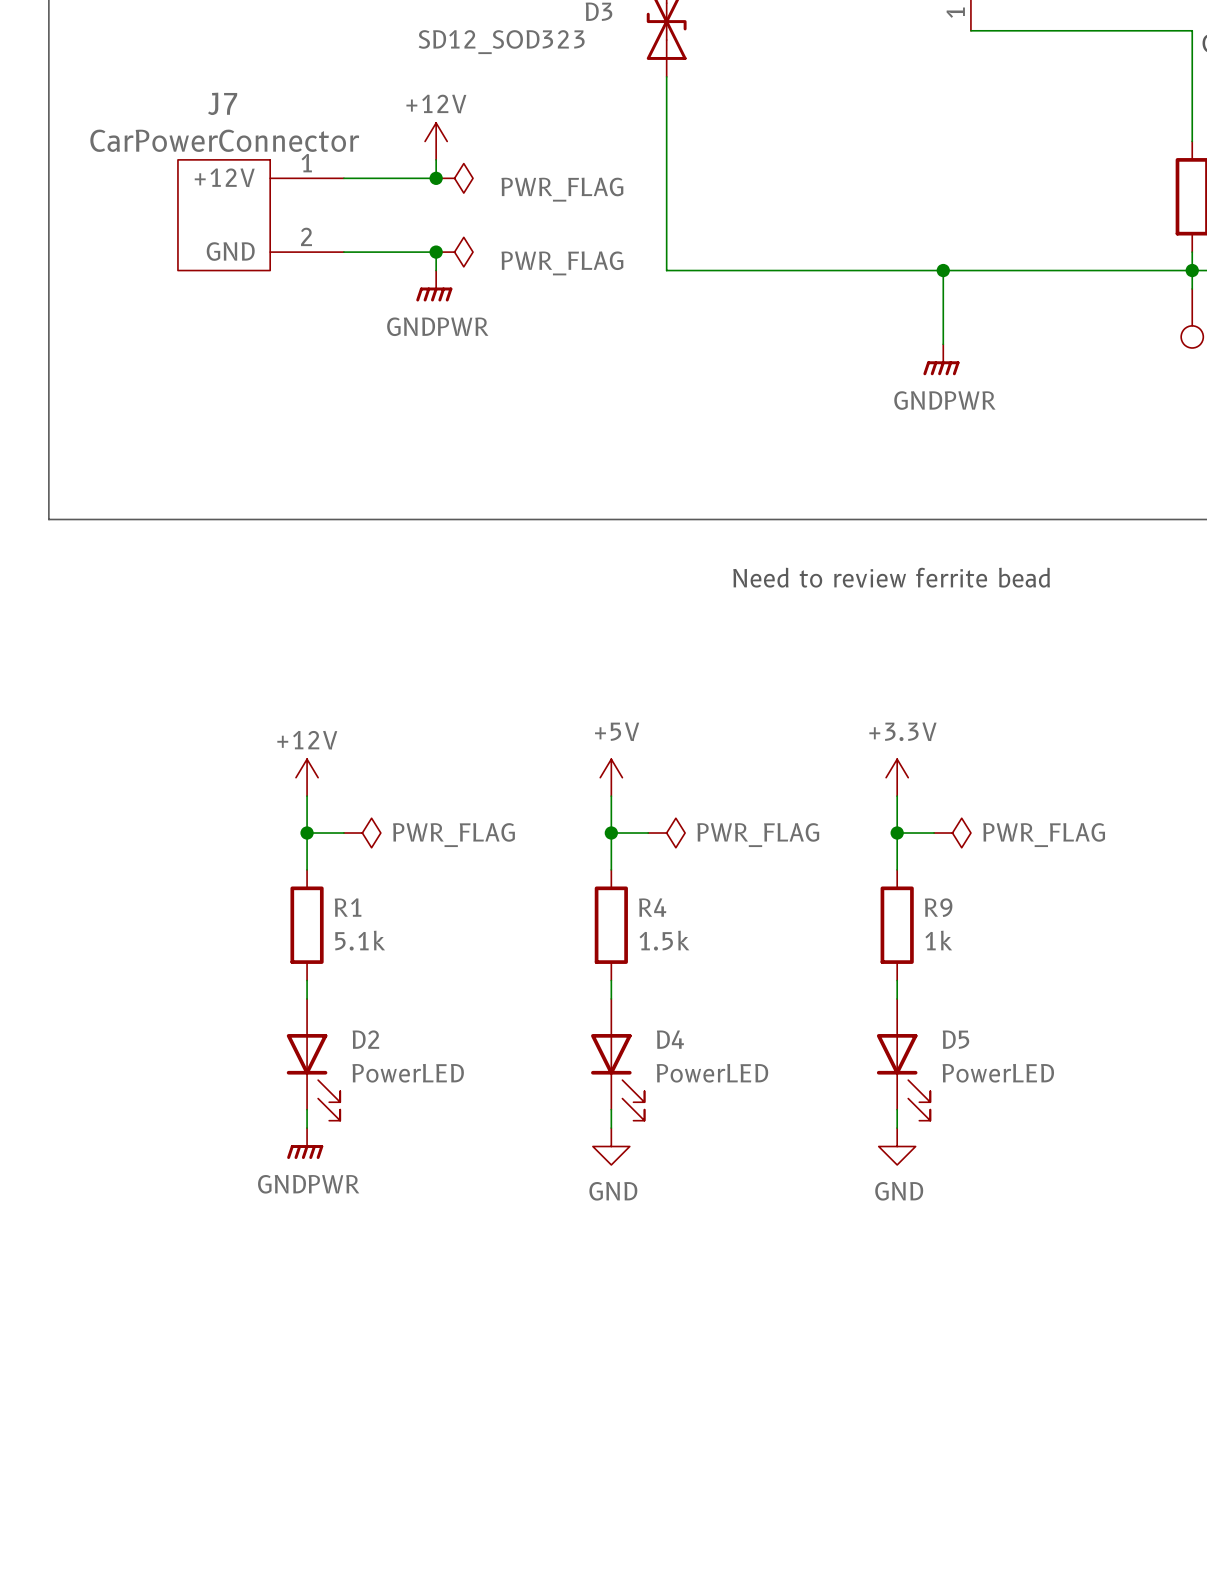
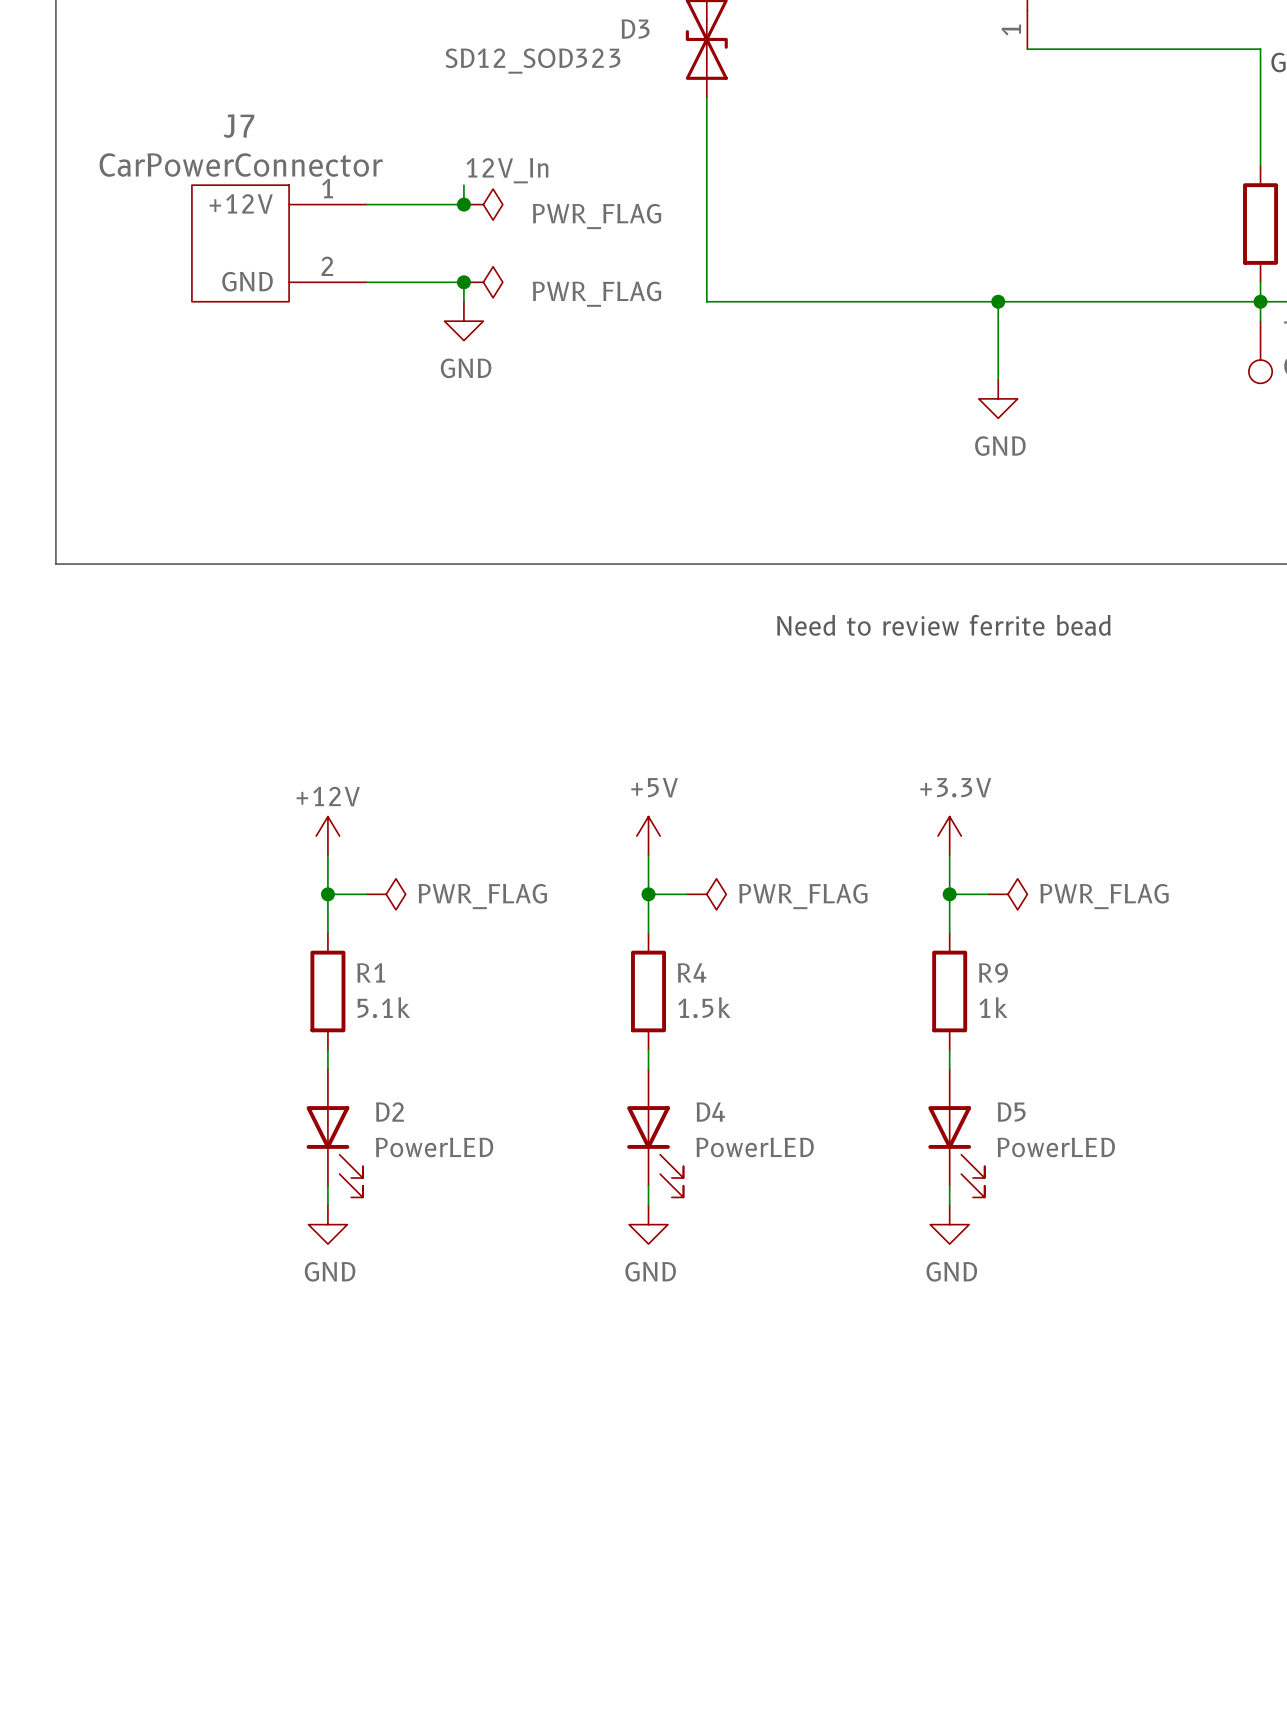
power symbol: +12V (436, 141) -> none
label: none -> 12V_In (507, 170)
power symbol: GNDPWR (434, 286) -> GND (463, 321)
power symbol: GNDPWR (941, 359) -> GND (998, 398)
power symbol: GNDPWR (305, 1143) -> GND (327, 1224)

